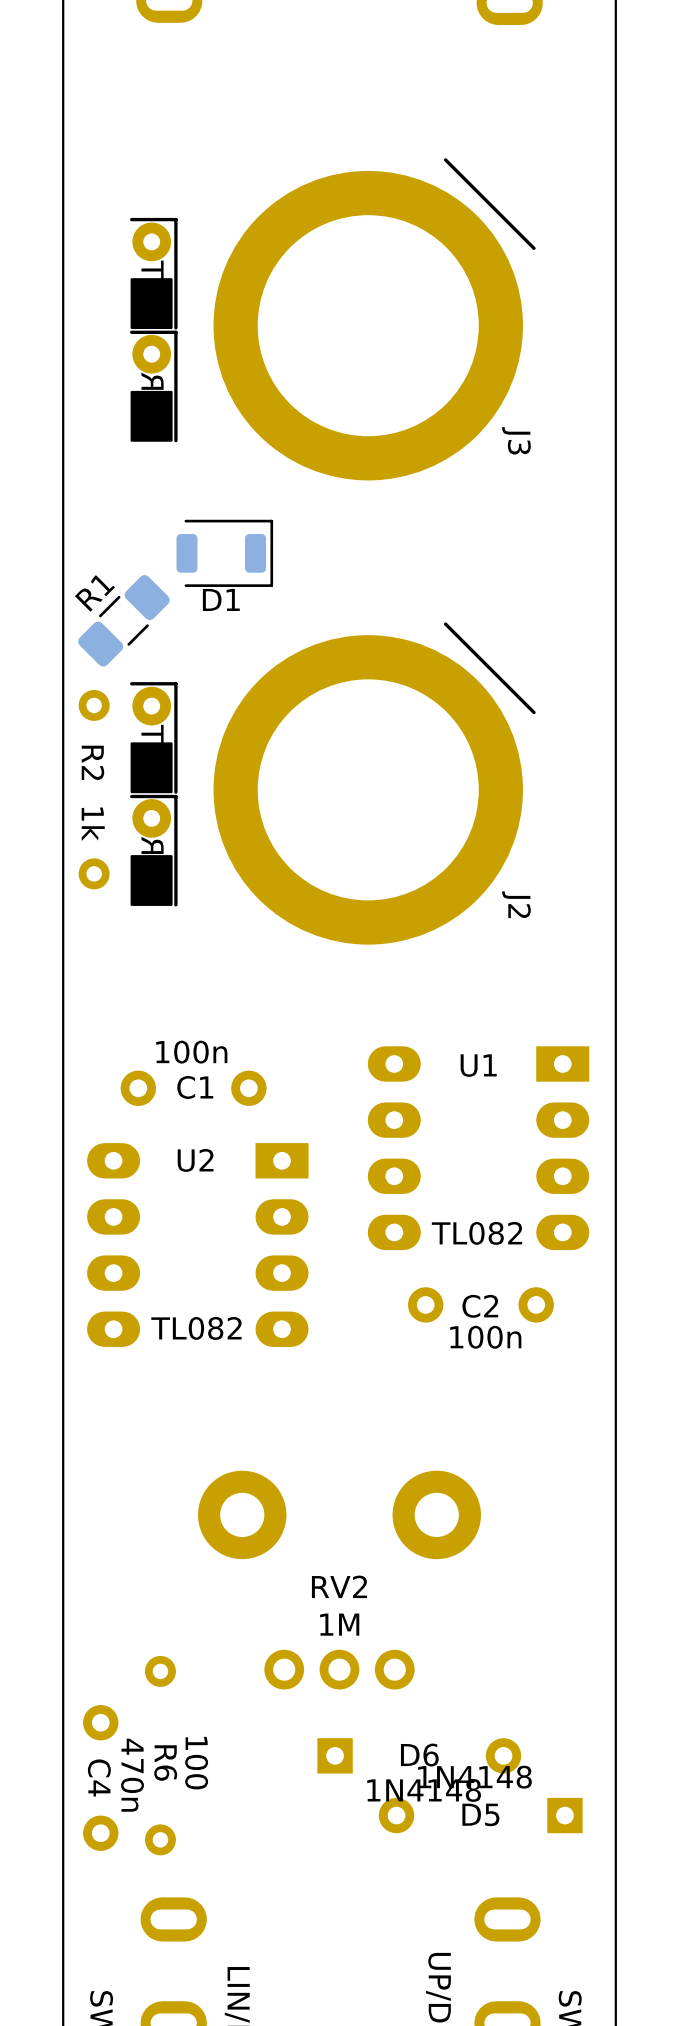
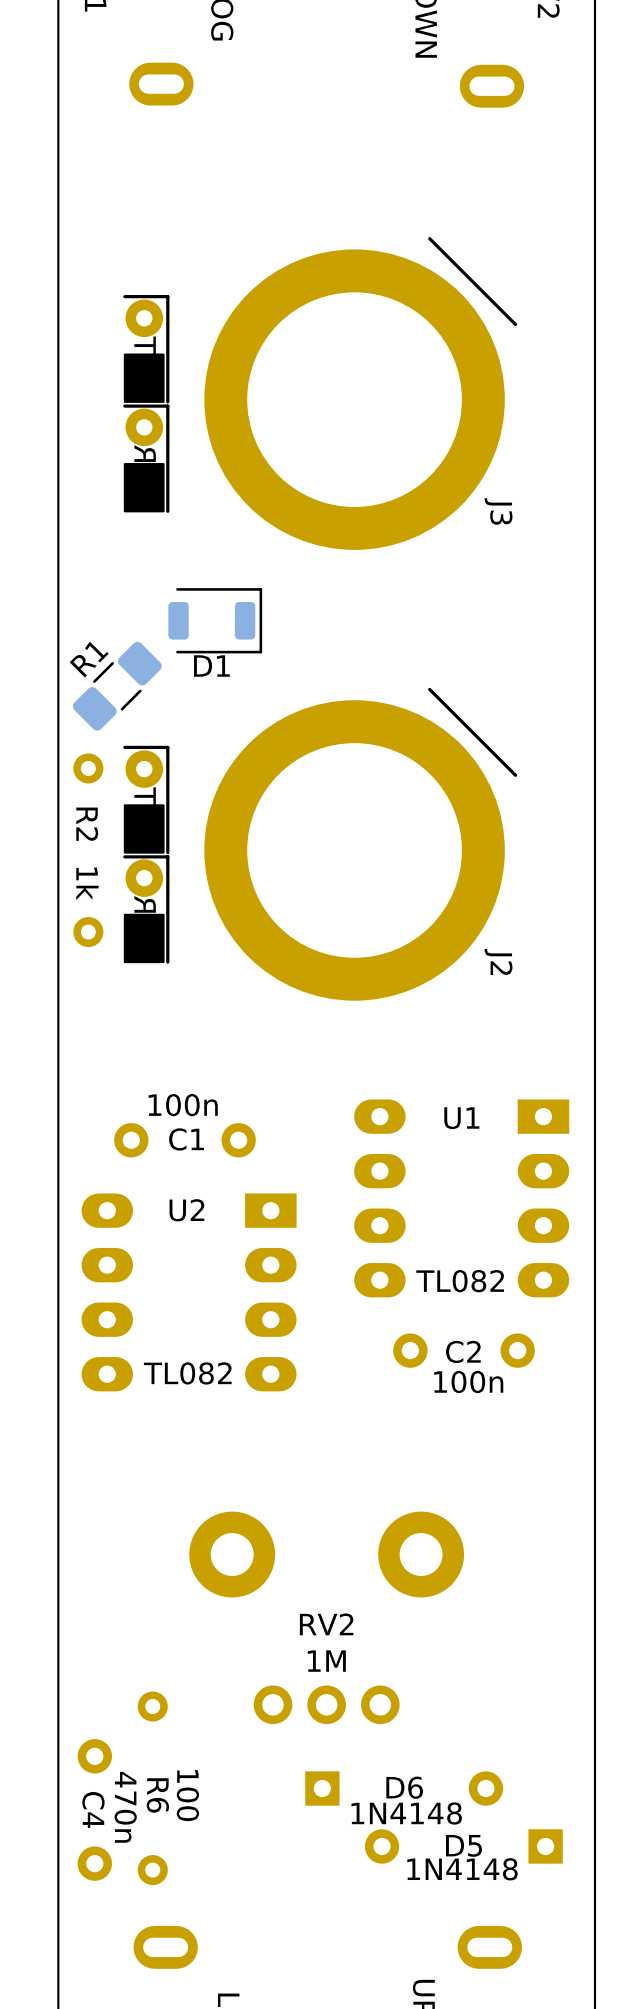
D5 value position: 1N4148 (474, 1777) -> 1N4148 (406, 1813)
D6 value position: 1N4148 (424, 1790) -> 1N4148 (462, 1869)

